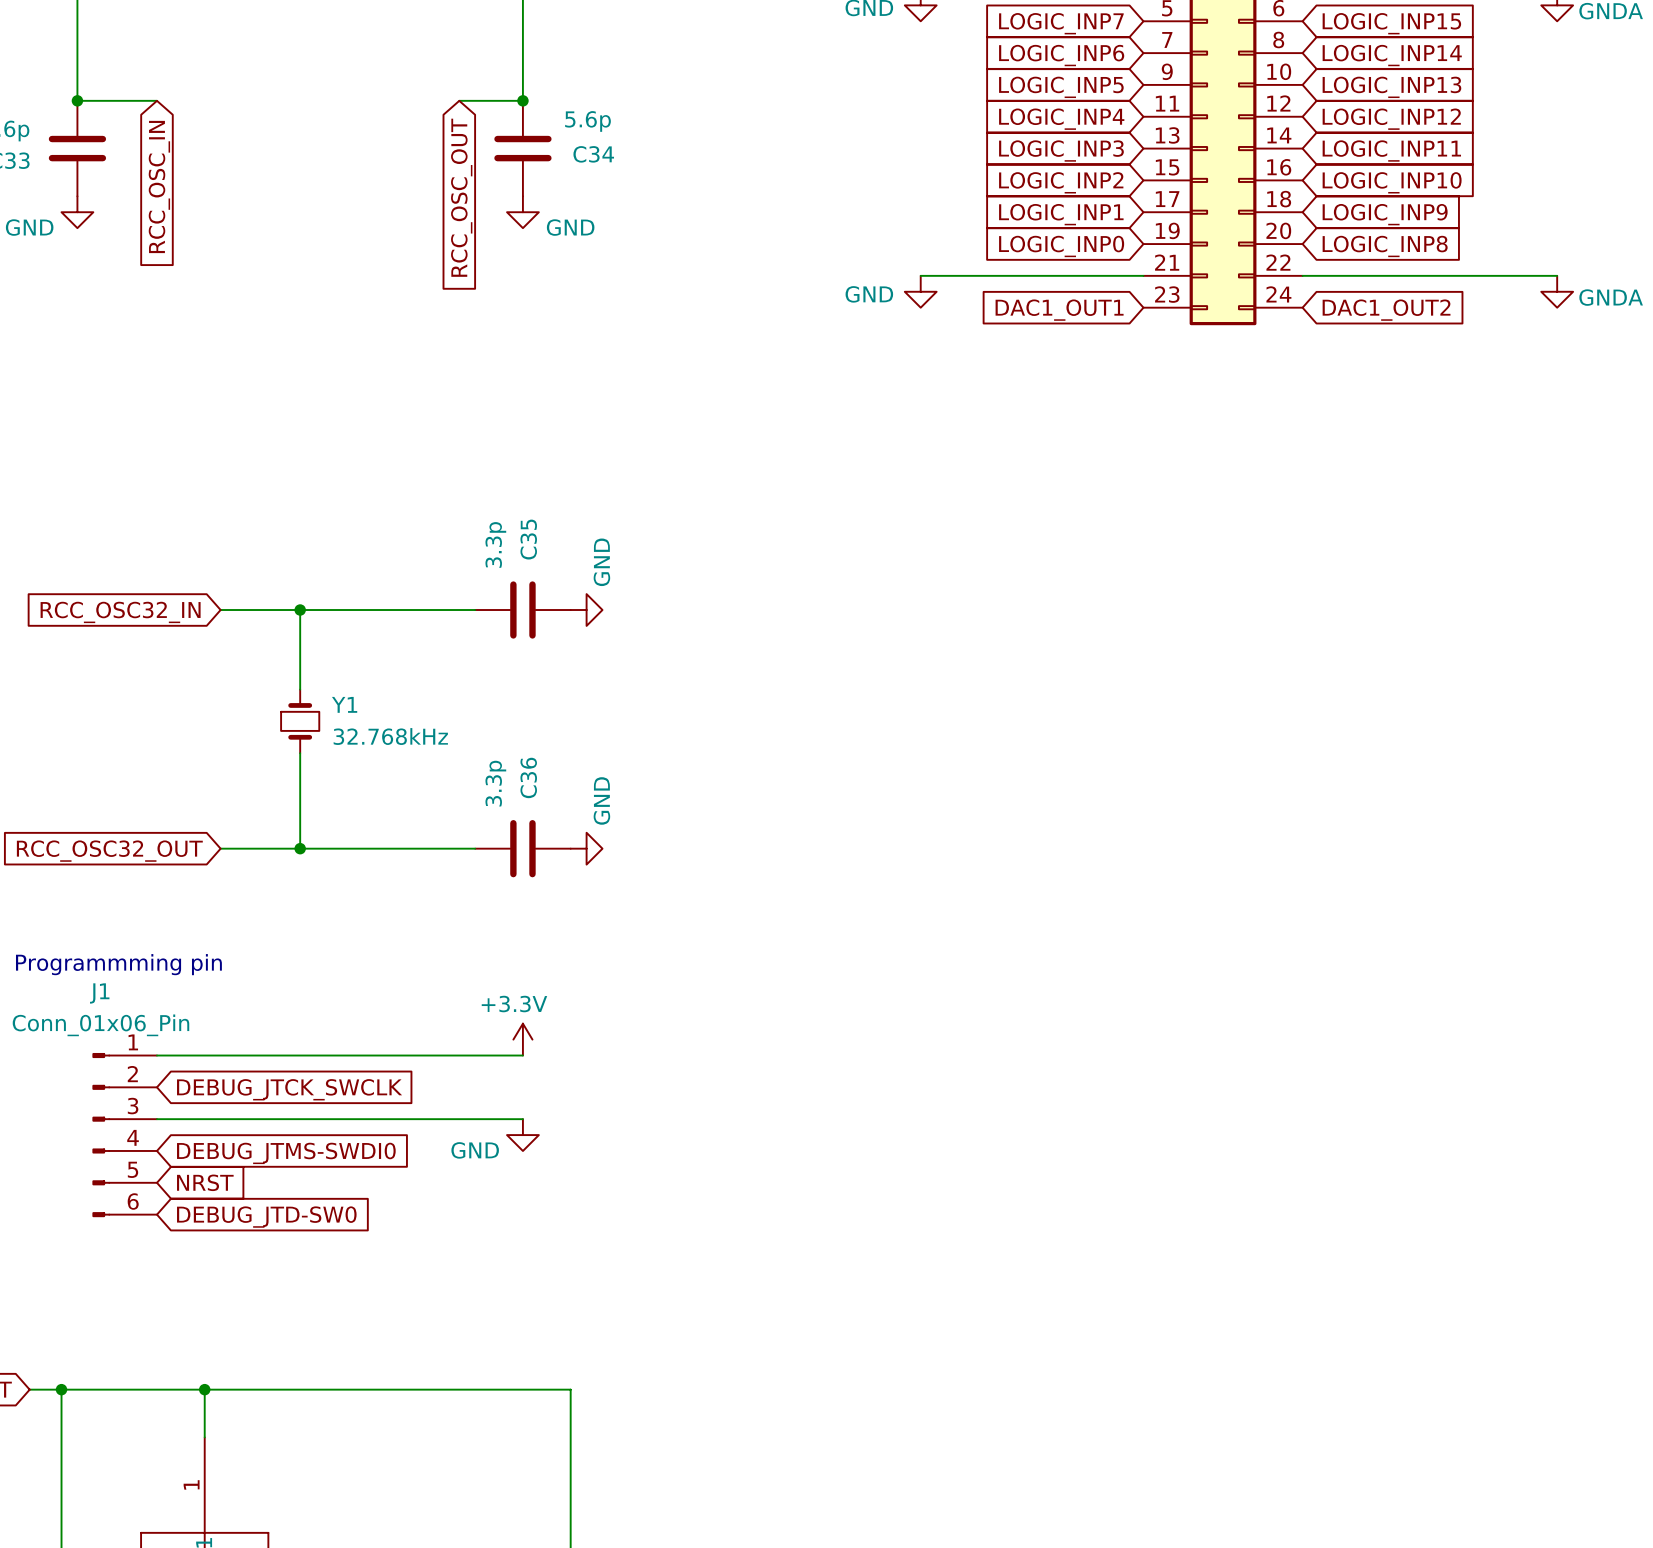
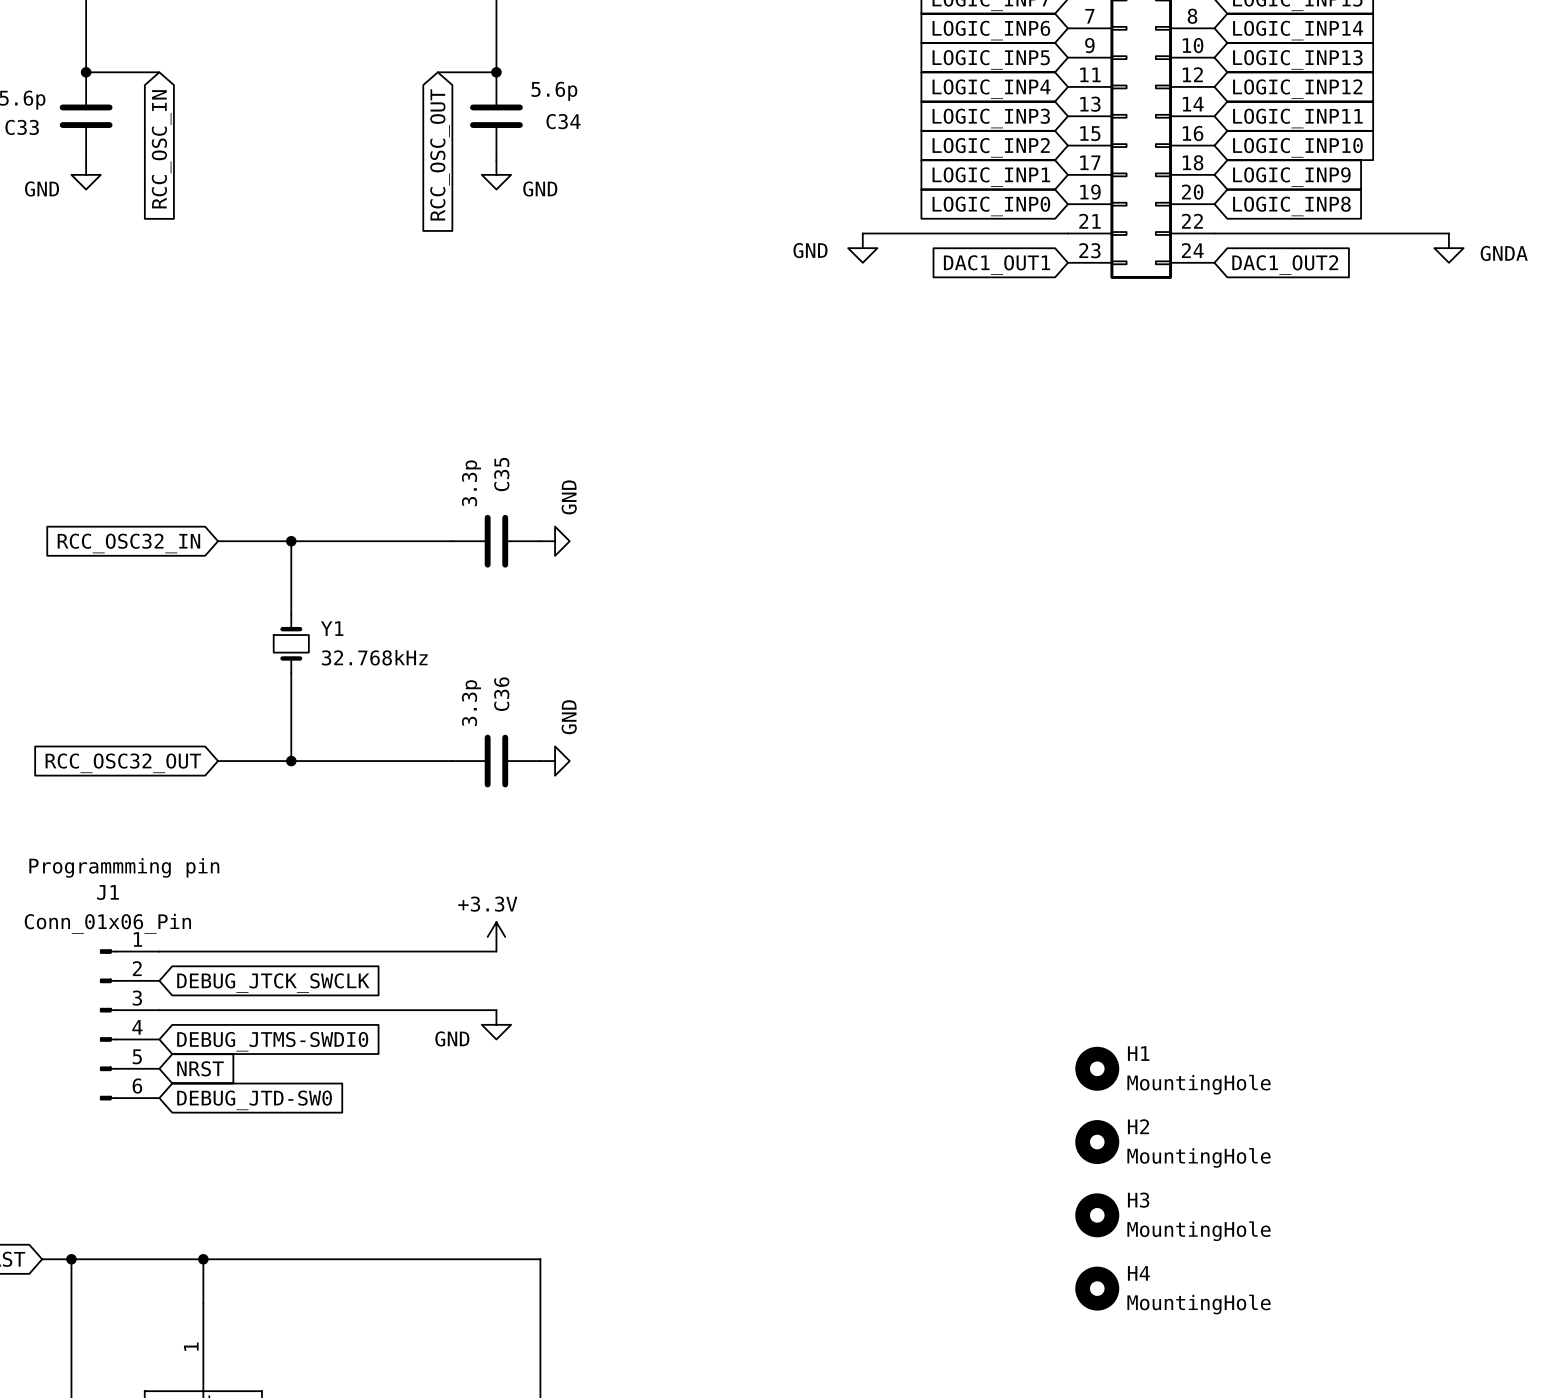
H1: none -> MountingHole (1097, 1068)
H2: none -> MountingHole (1097, 1142)
H3: none -> MountingHole (1097, 1215)
H4: none -> MountingHole (1097, 1288)

